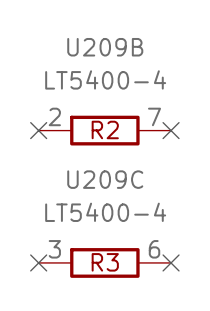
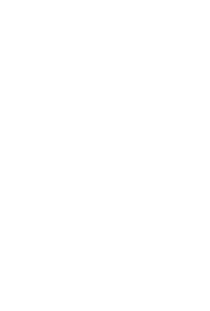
no-connect mark: (38, 130) -> none
U209B: LT5400-4 (104, 130) -> none
no-connect mark: (171, 130) -> none
no-connect mark: (38, 262) -> none
U209C: LT5400-4 (104, 262) -> none
no-connect mark: (171, 262) -> none

